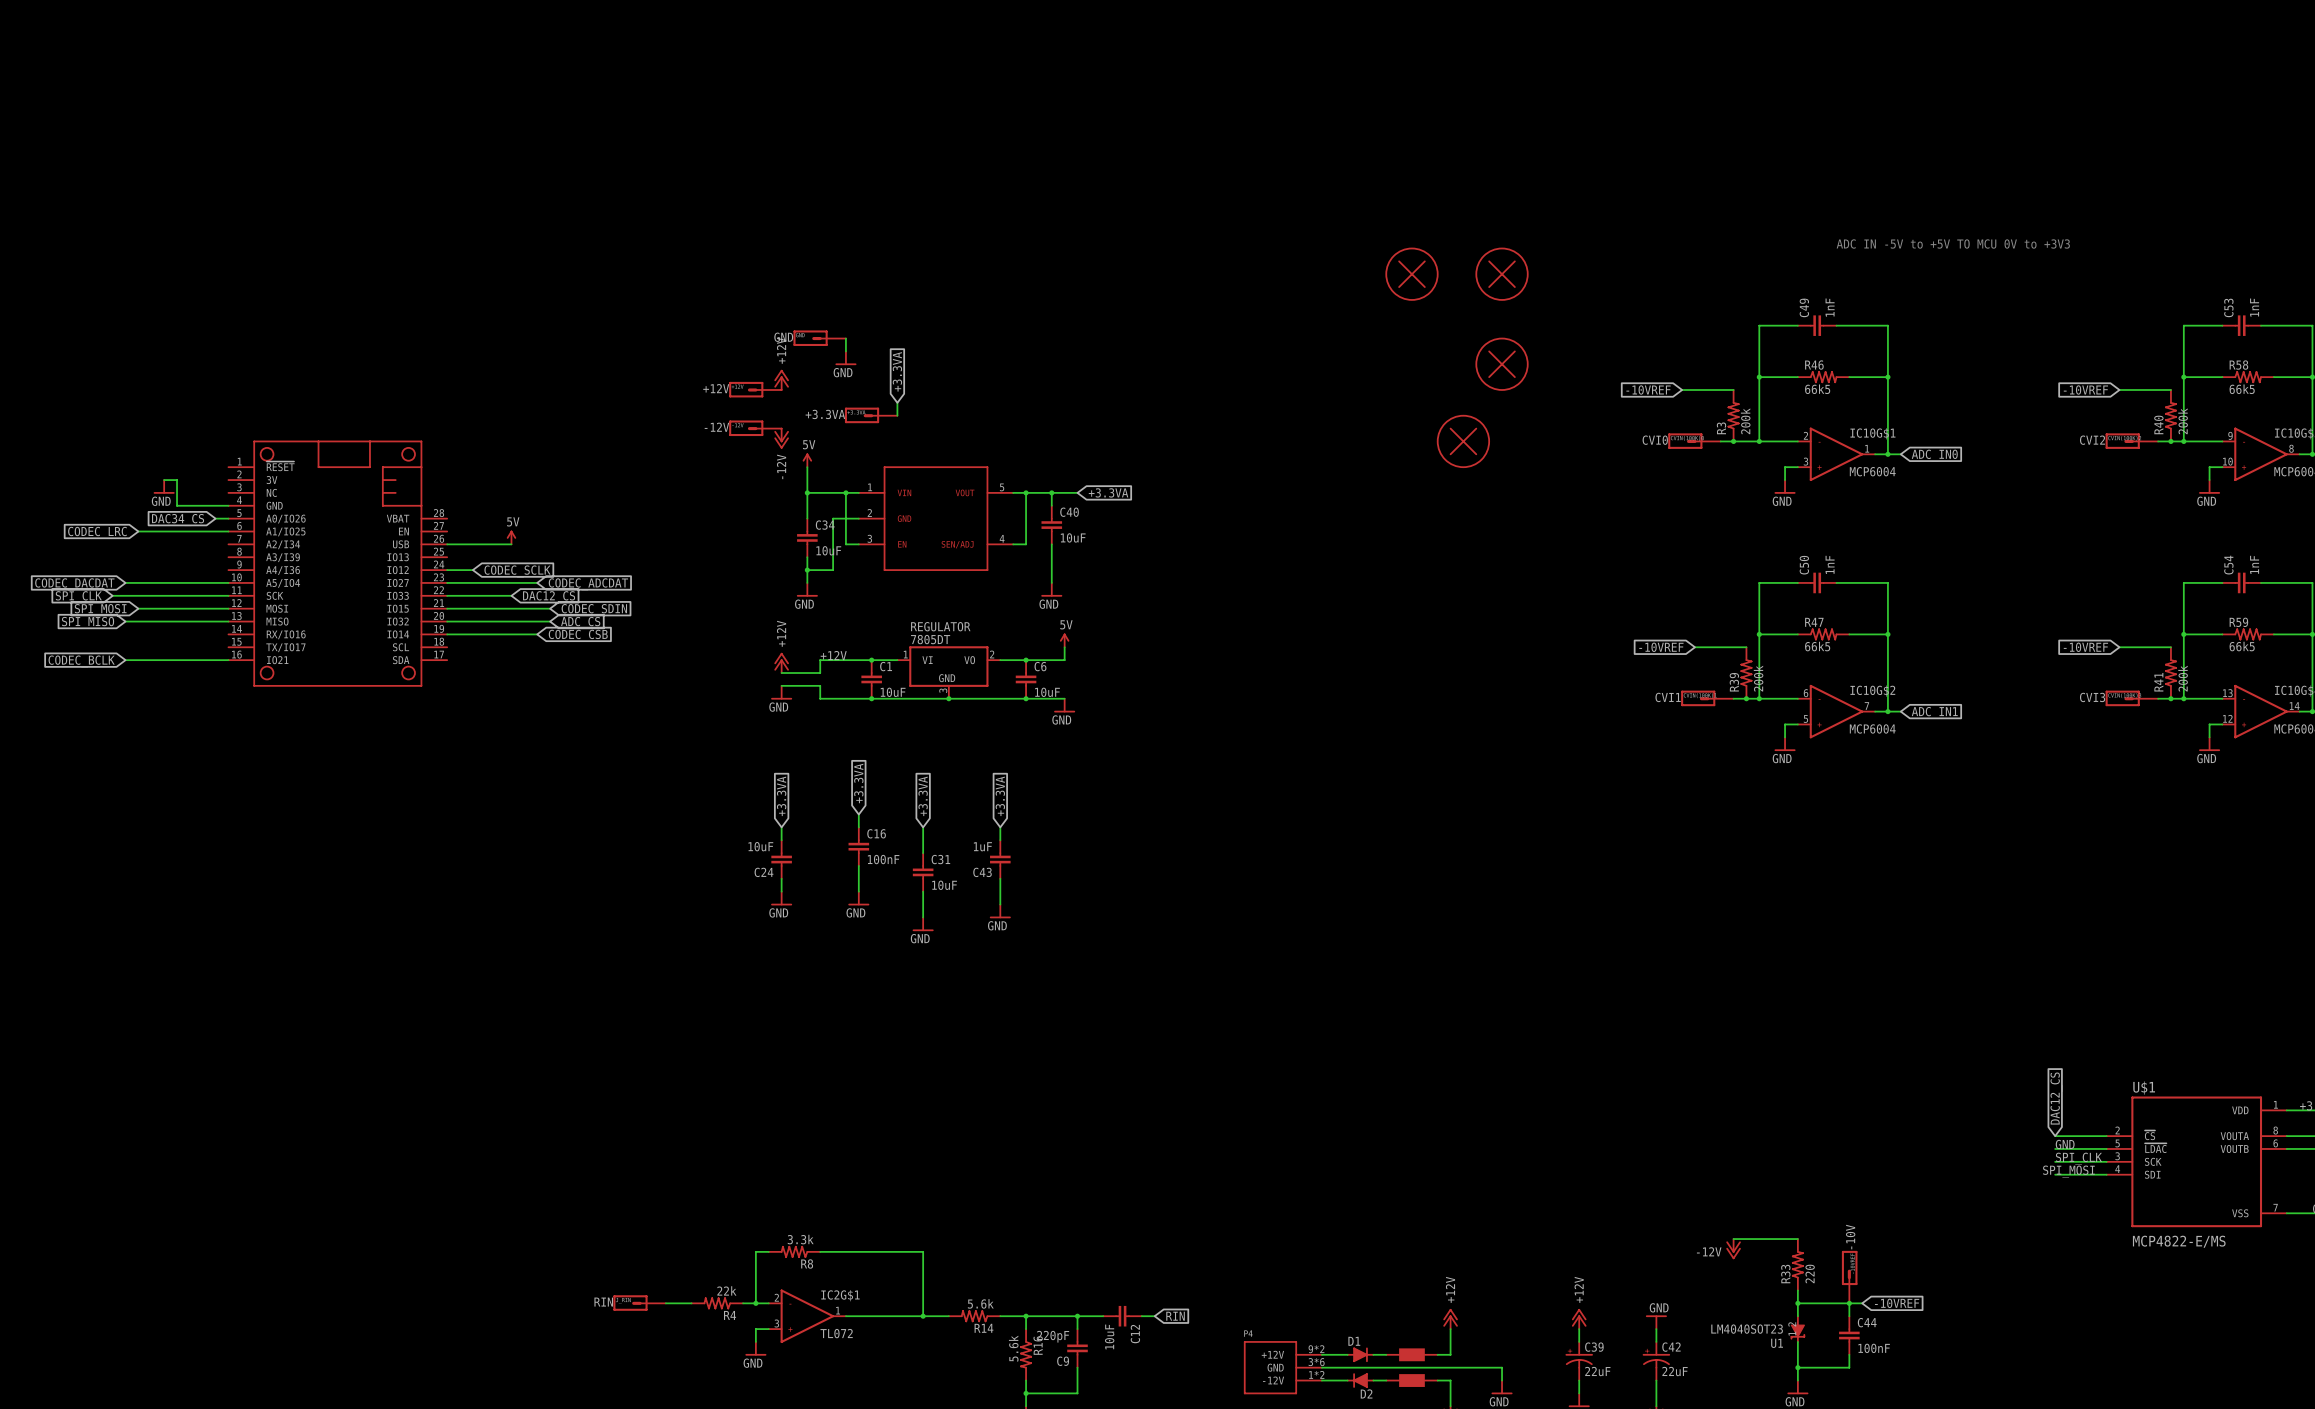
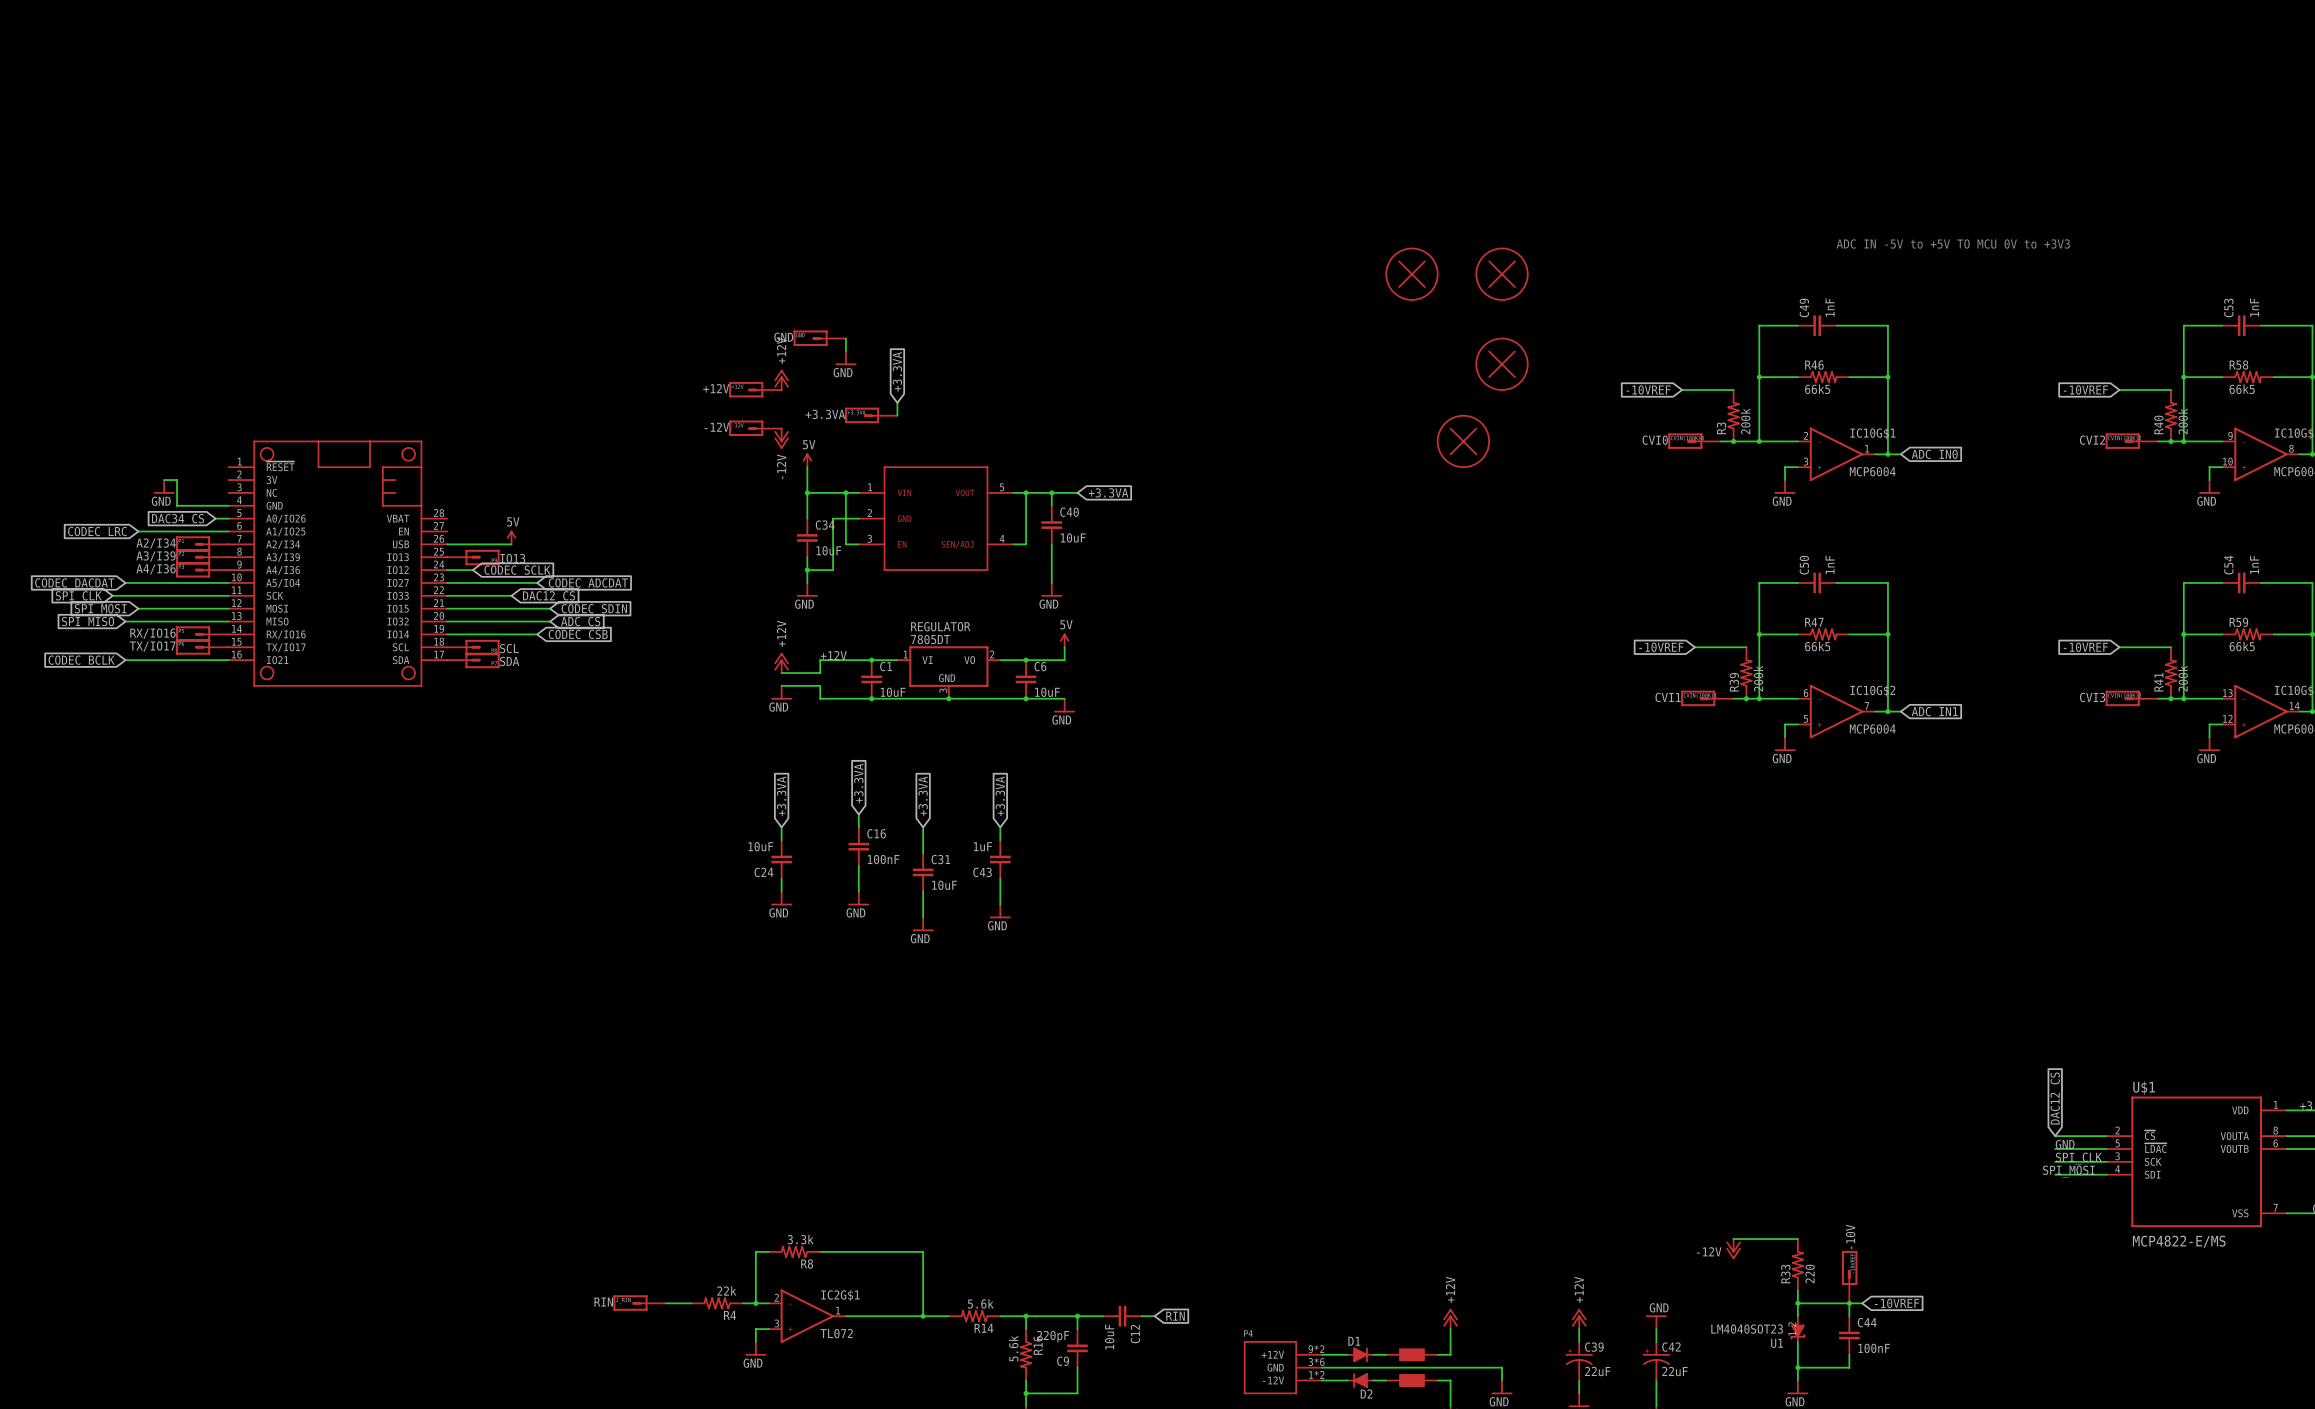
part: none -> A2/I34 (202, 544)
part: none -> A3/I39 (202, 556)
part: none -> IO13 (473, 557)
part: none -> A4/I36 (202, 569)
part: none -> RX/IO16 (202, 634)
part: none -> TX/IO17 (202, 646)
part: none -> SCL (473, 647)
part: none -> SDA (473, 660)

